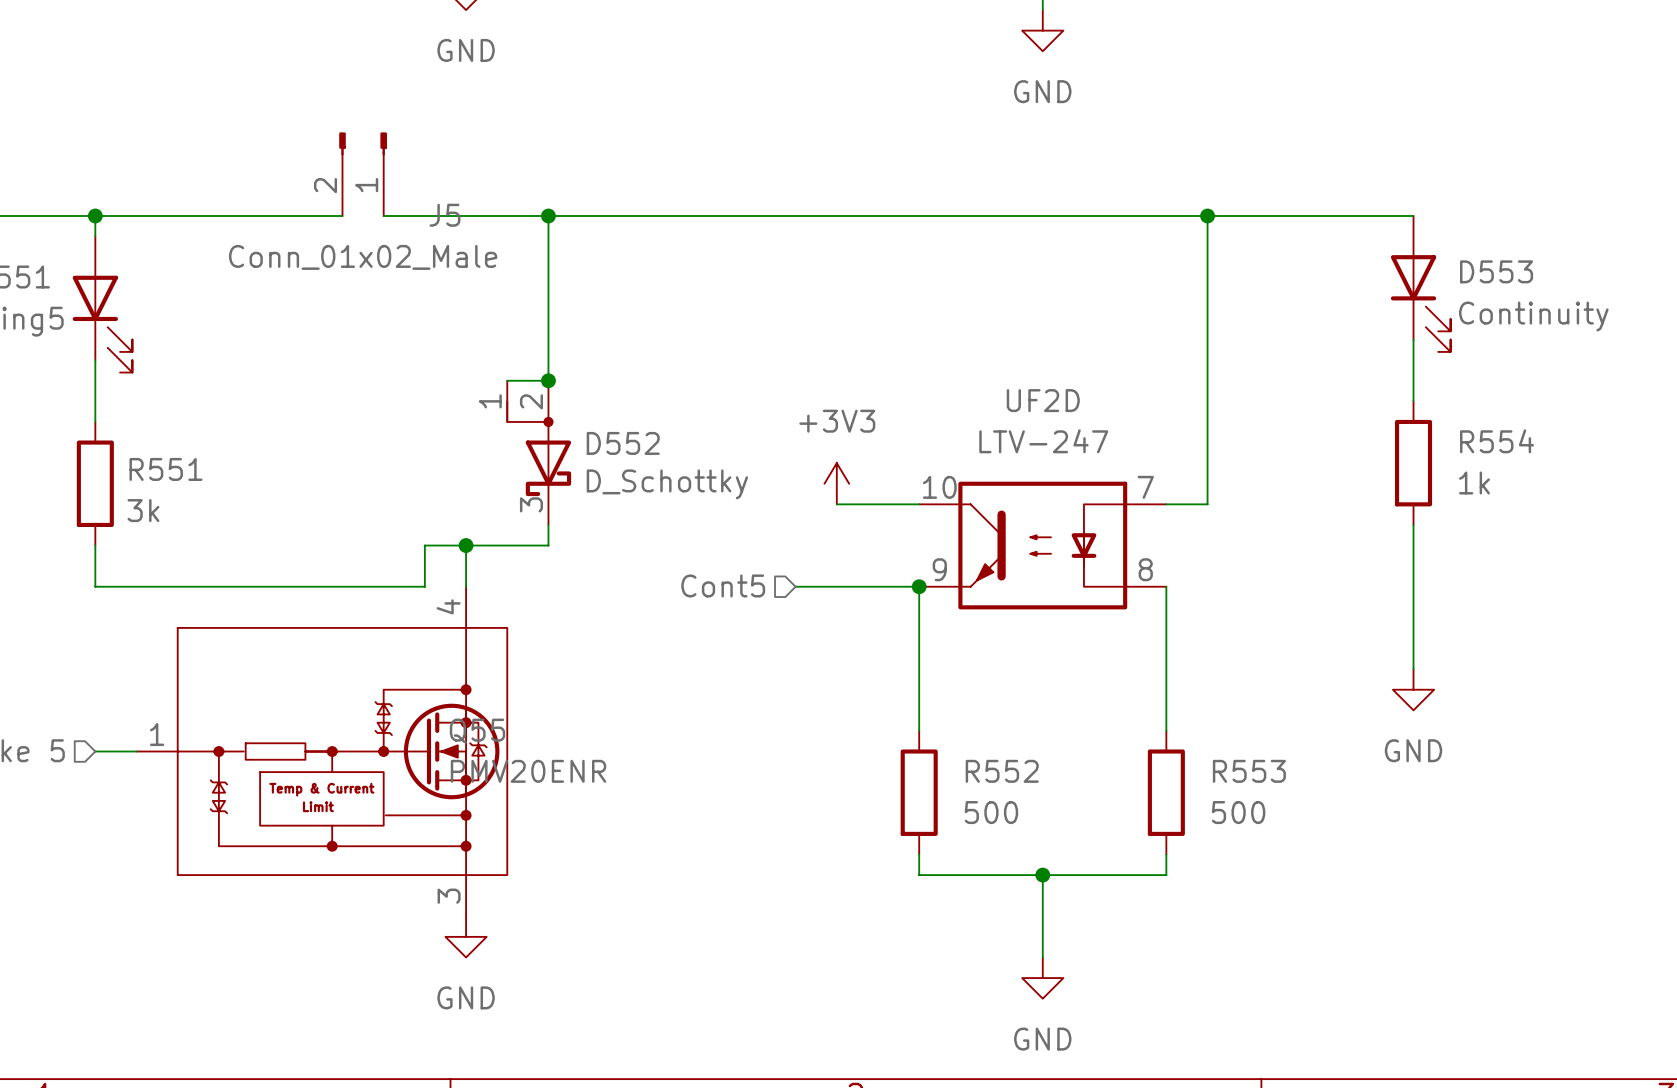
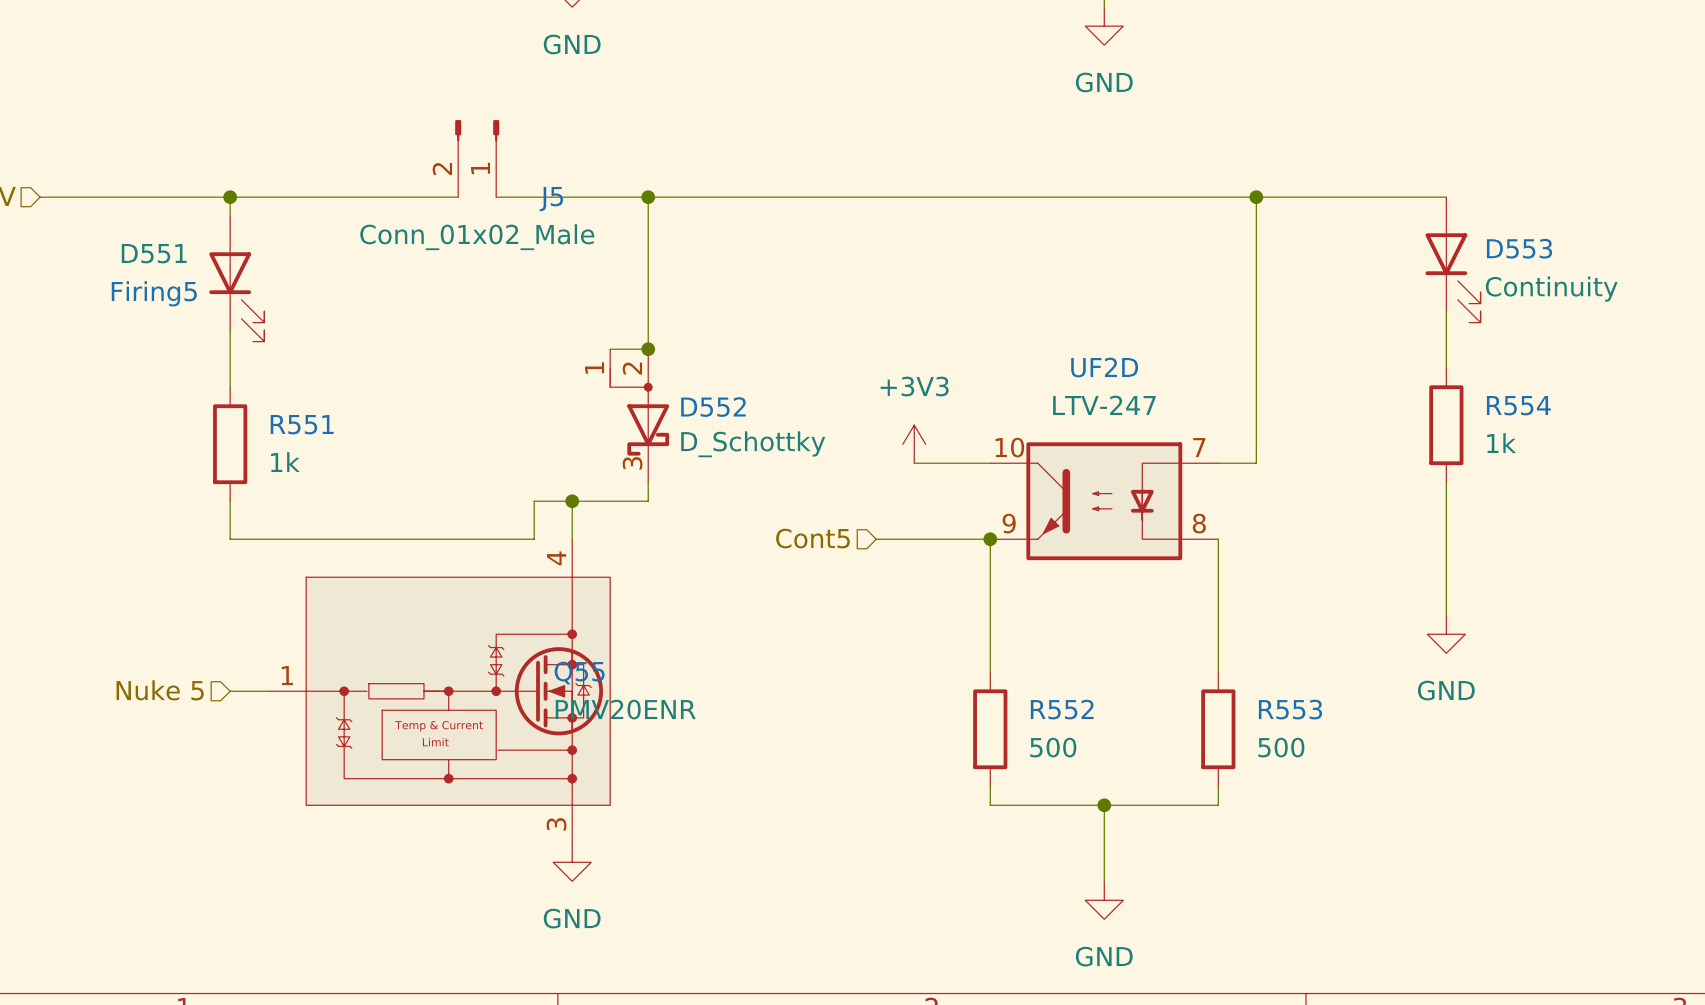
R551 name position: R551 (166, 469) -> R551 (302, 424)
R551 value: 3k (143, 510) -> 1k (285, 462)

